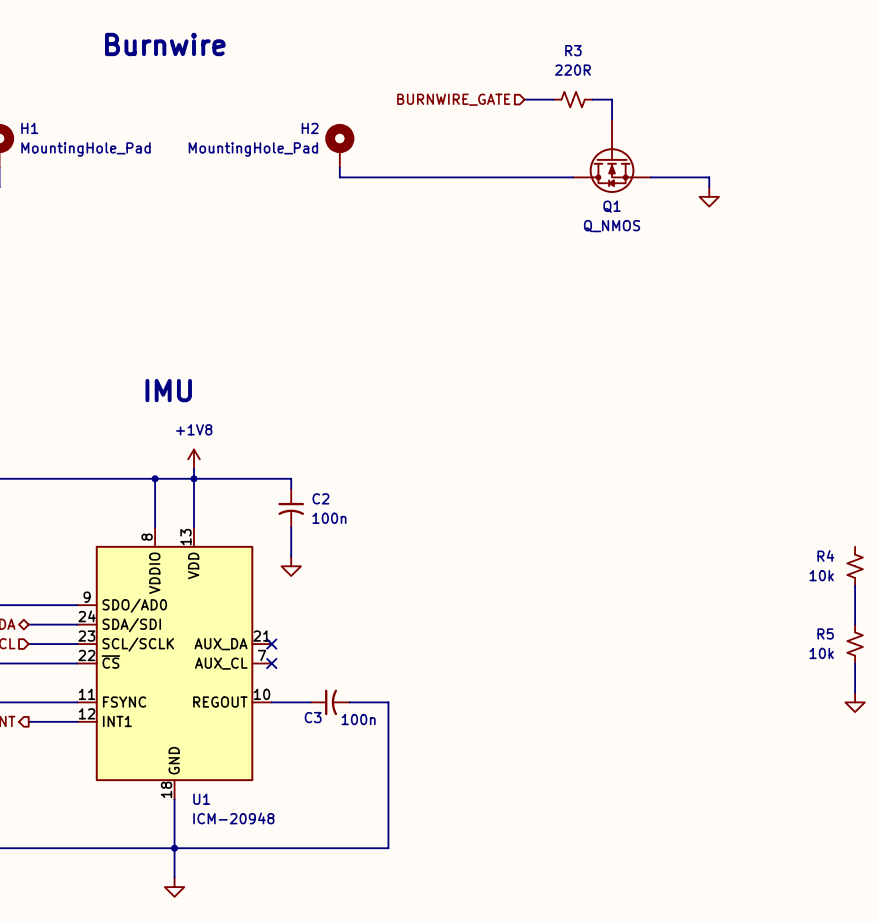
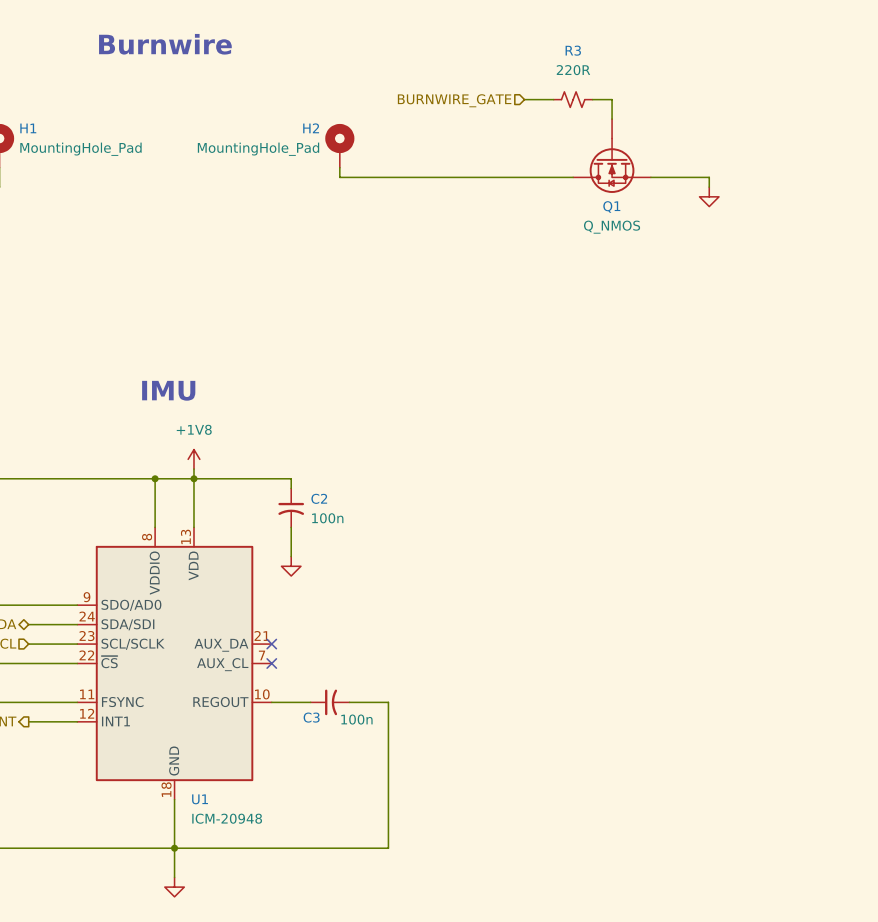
R4: 10k (855, 566) -> none
wire: (855, 585) (855, 624) -> none
R5: 10k (855, 644) -> none
wire: (855, 663) (855, 692) -> none
power symbol: (855, 702) -> none

